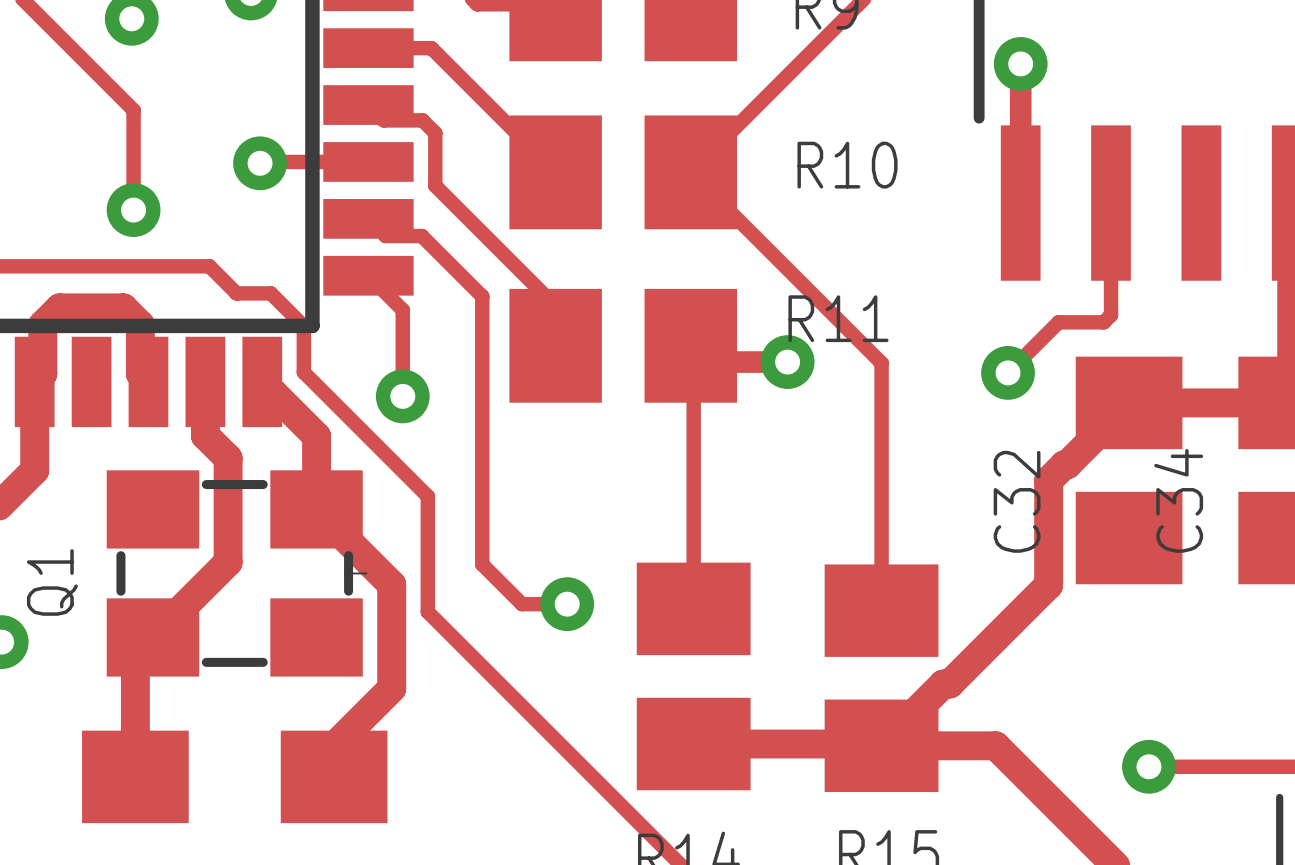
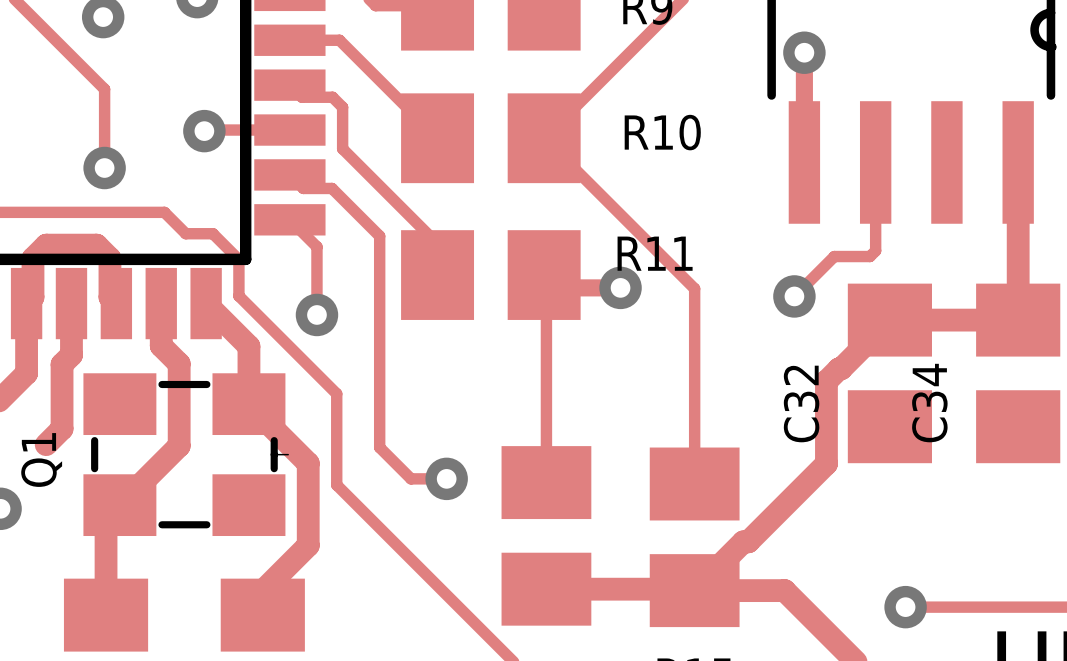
track: none -> (71, 303) (71, 355) (62, 364) (62, 428) (46, 444)

